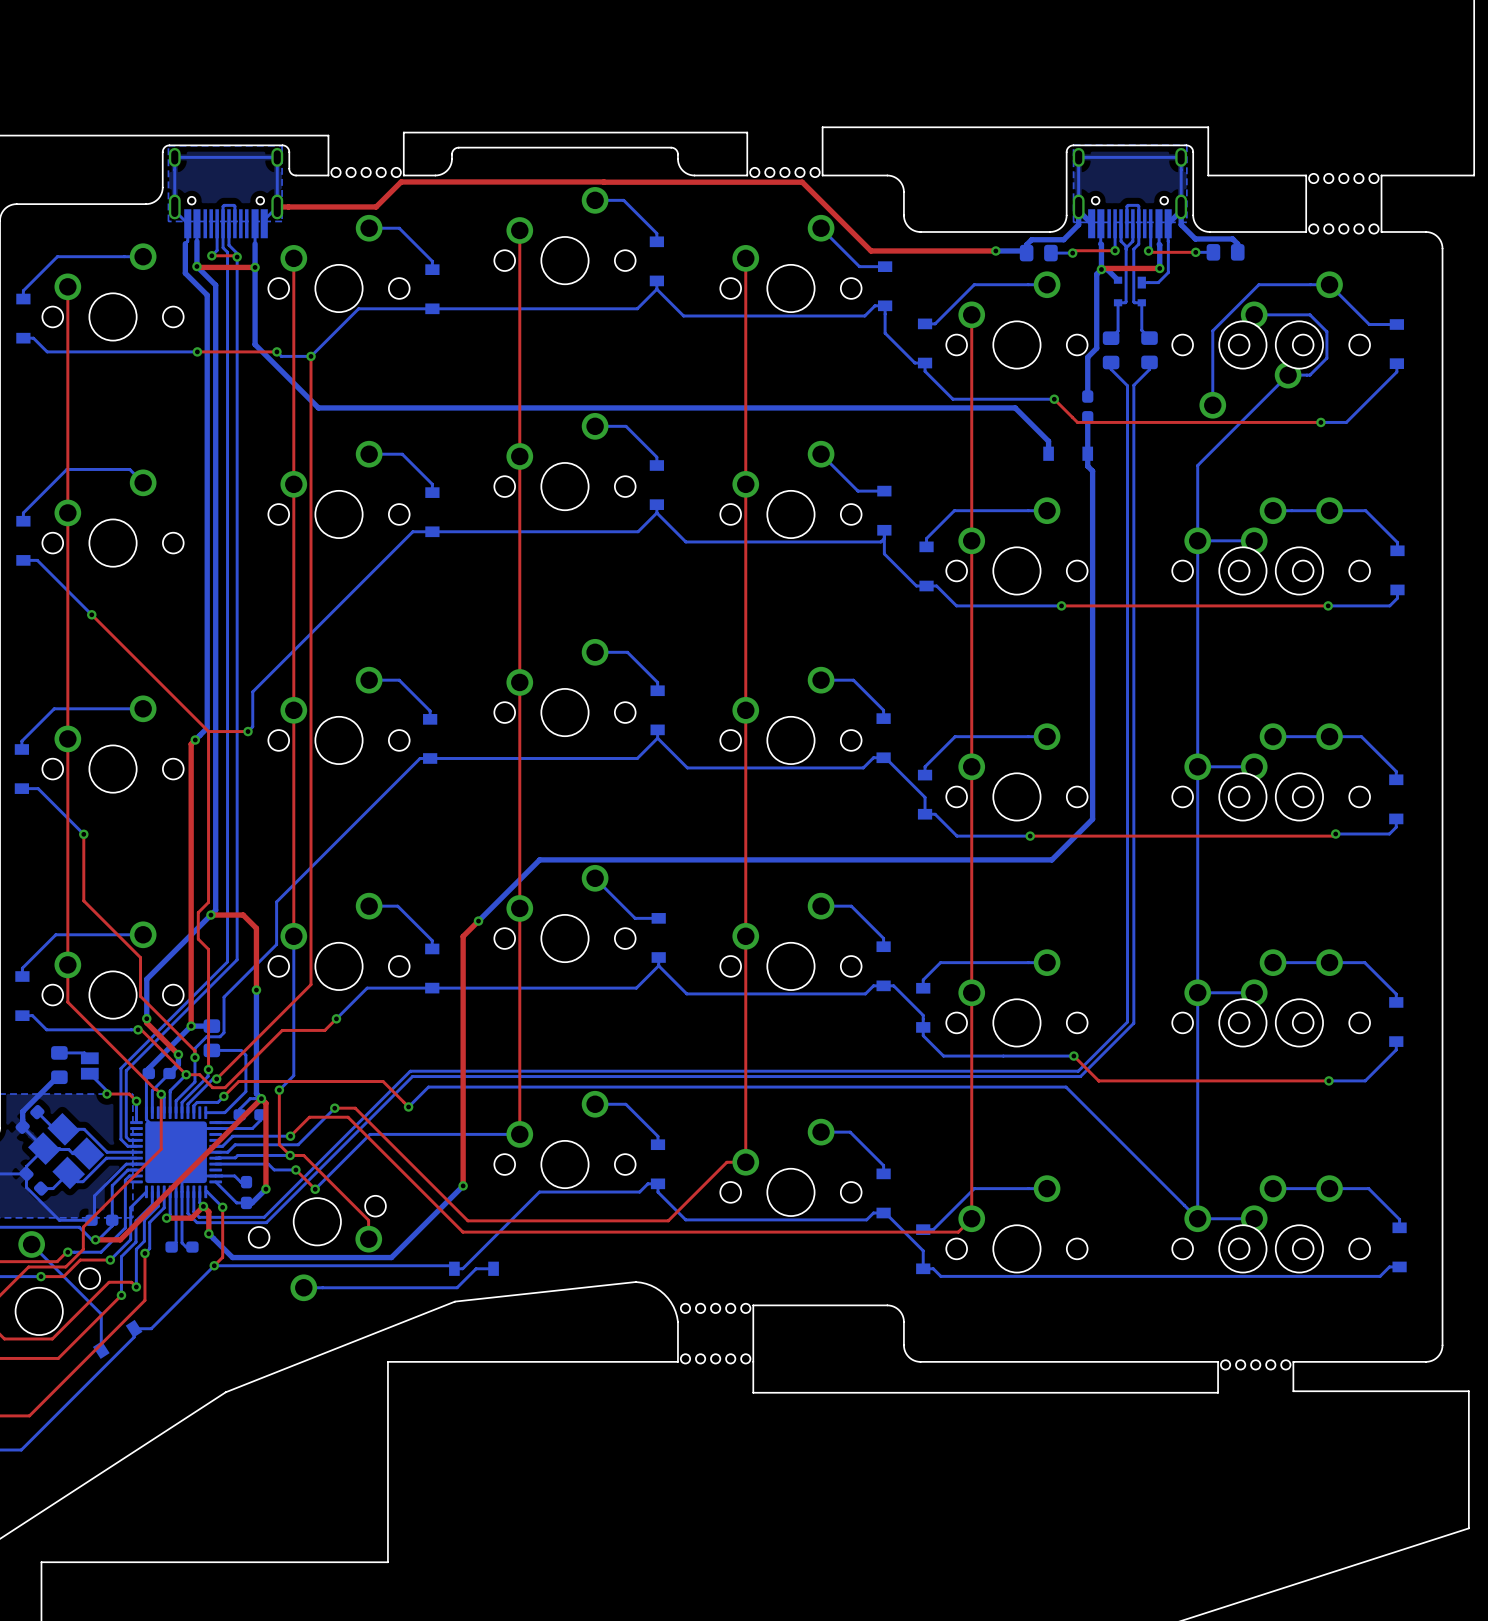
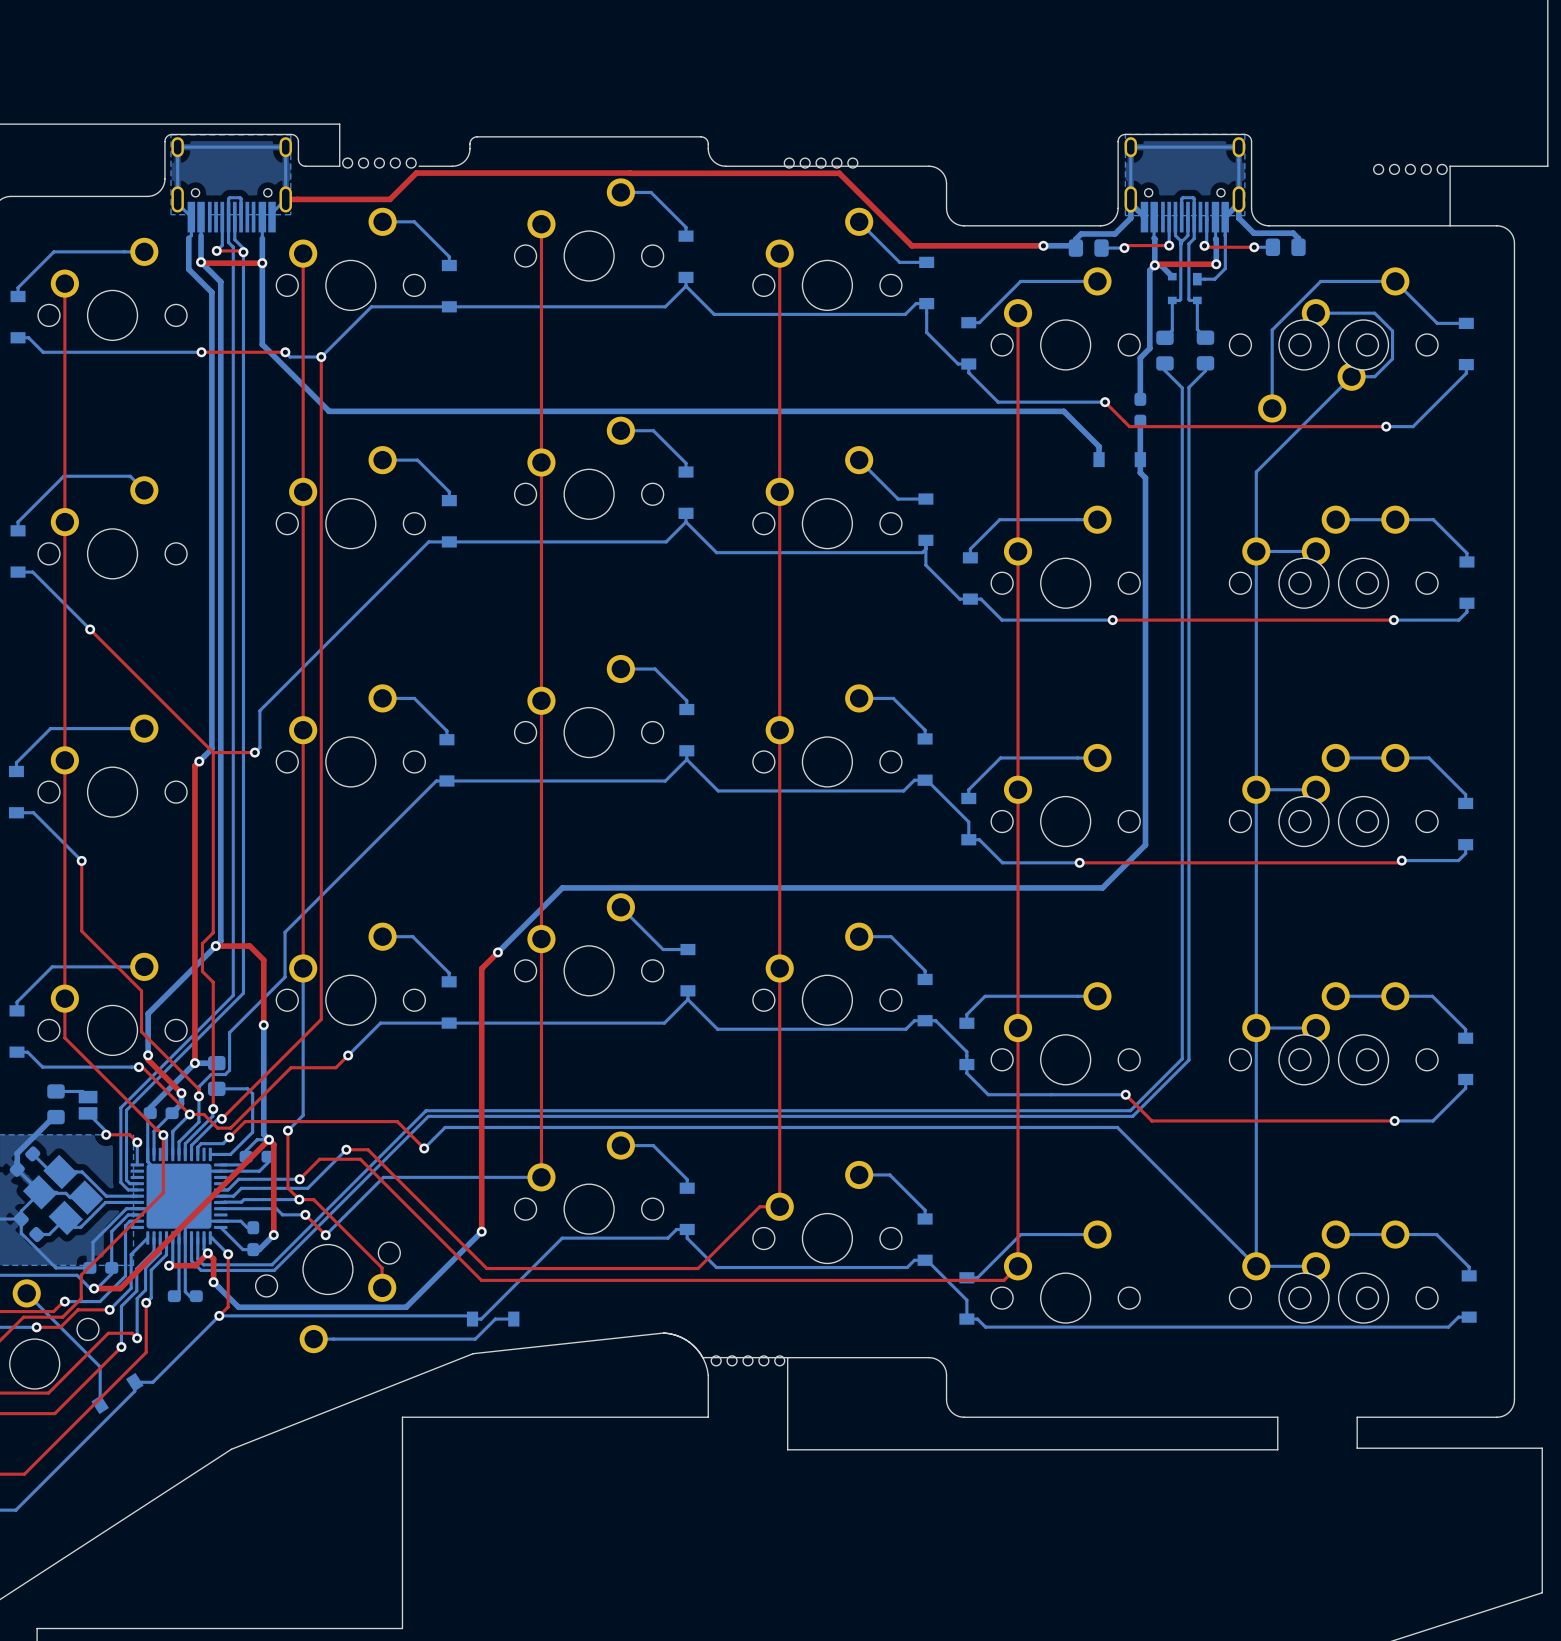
board edge: (403, 175) (403, 132) (747, 132) (747, 175) -> (860, 166) (781, 166)
board edge: (822, 175) (822, 127) (1208, 127) (1208, 175) (1306, 175) (1306, 231) -> (1450, 225) (1370, 225)
part: (1343, 228) -> none
board edge: none -> (663, 1333) (675, 1335) (686, 1340) (695, 1347) (702, 1357) (787, 1357)
part: (715, 1358) -> none
part: (1255, 1364) -> none

